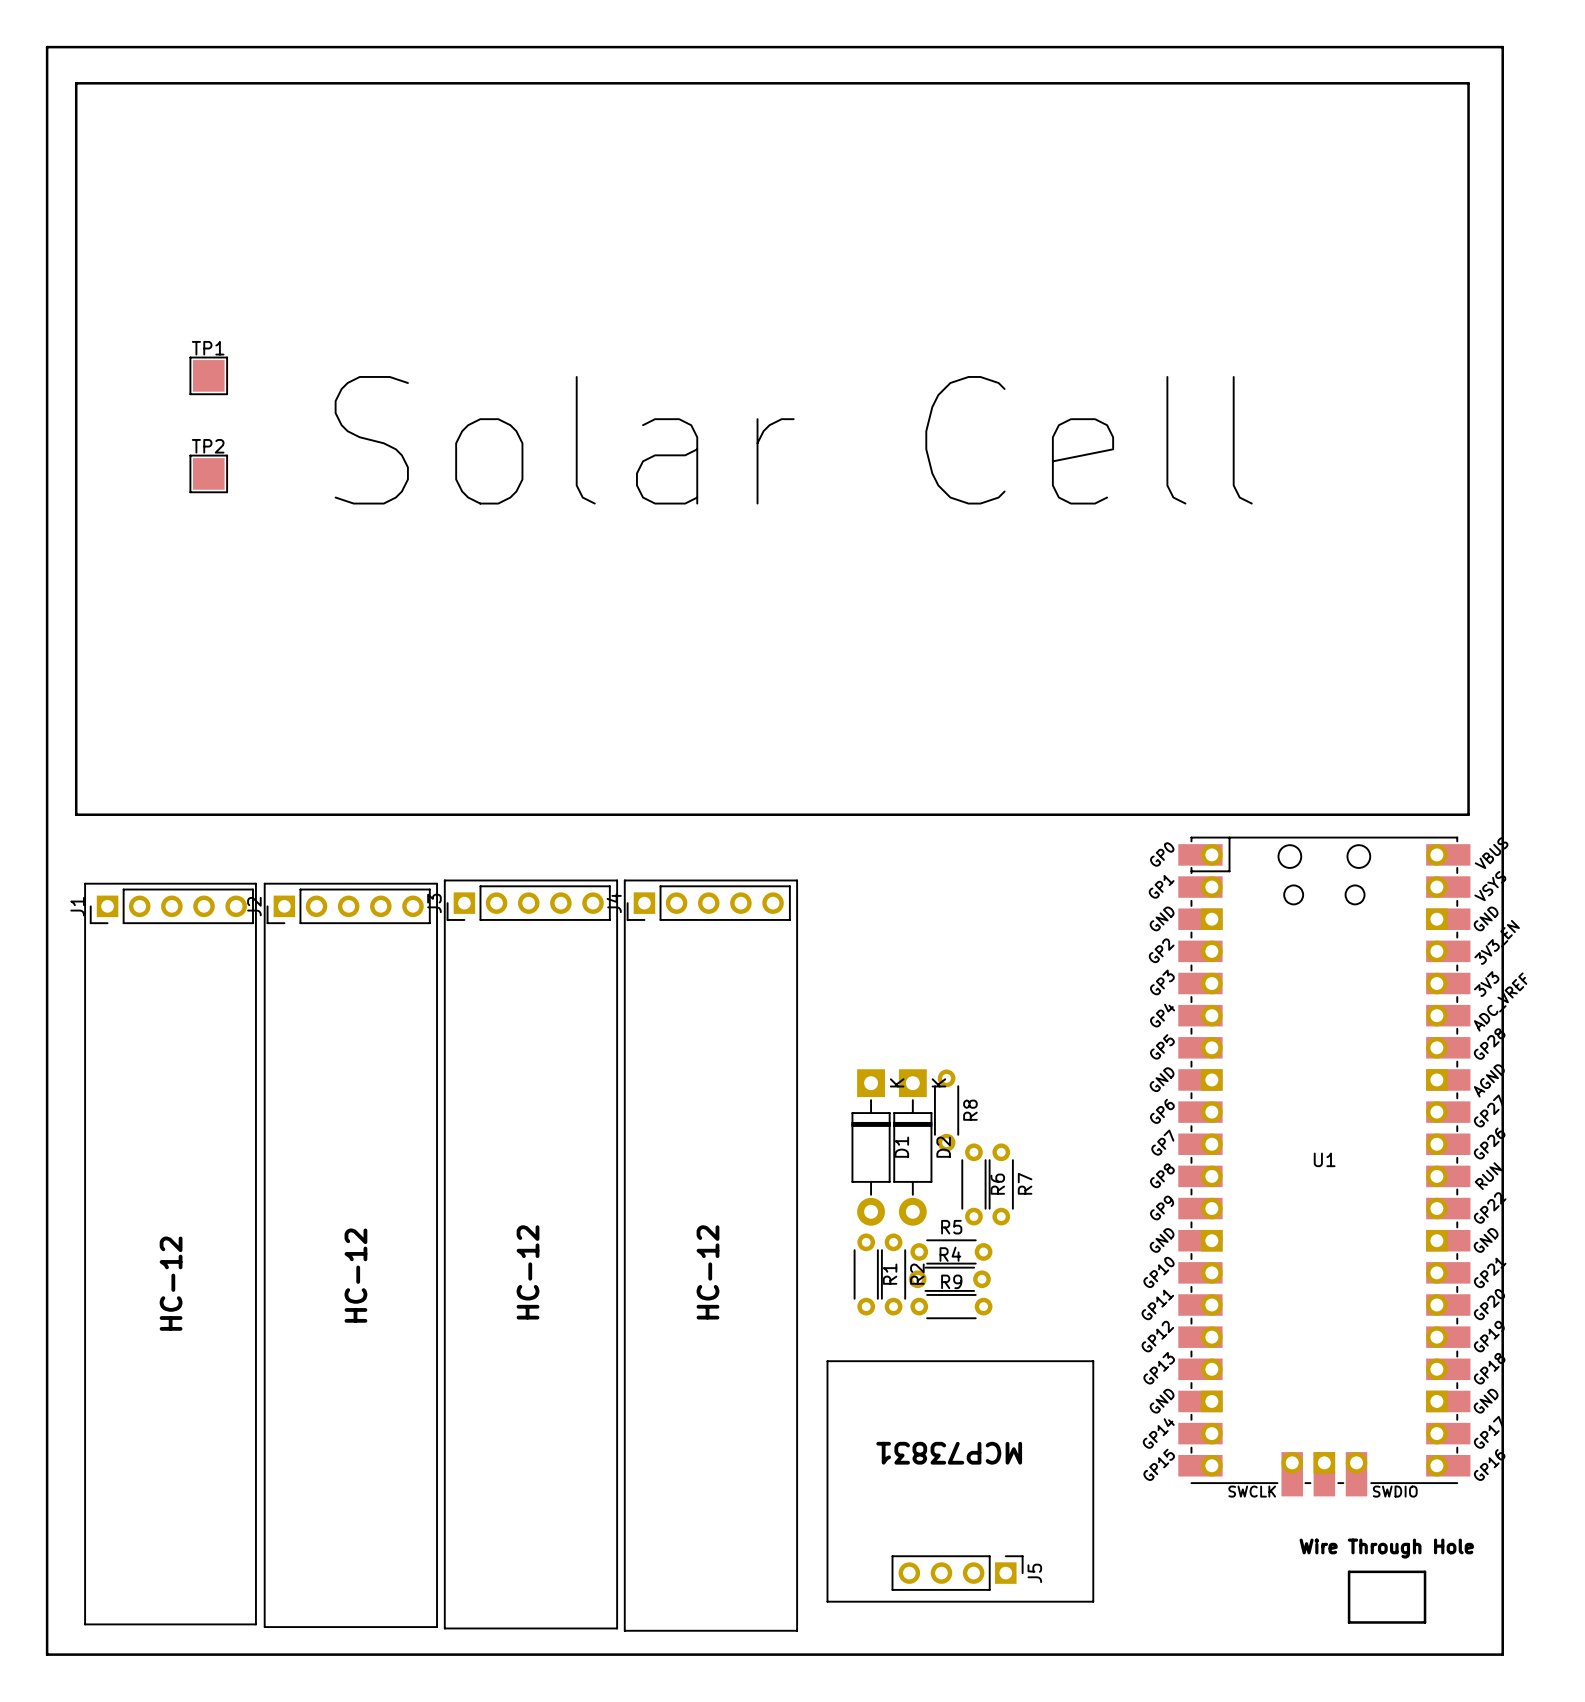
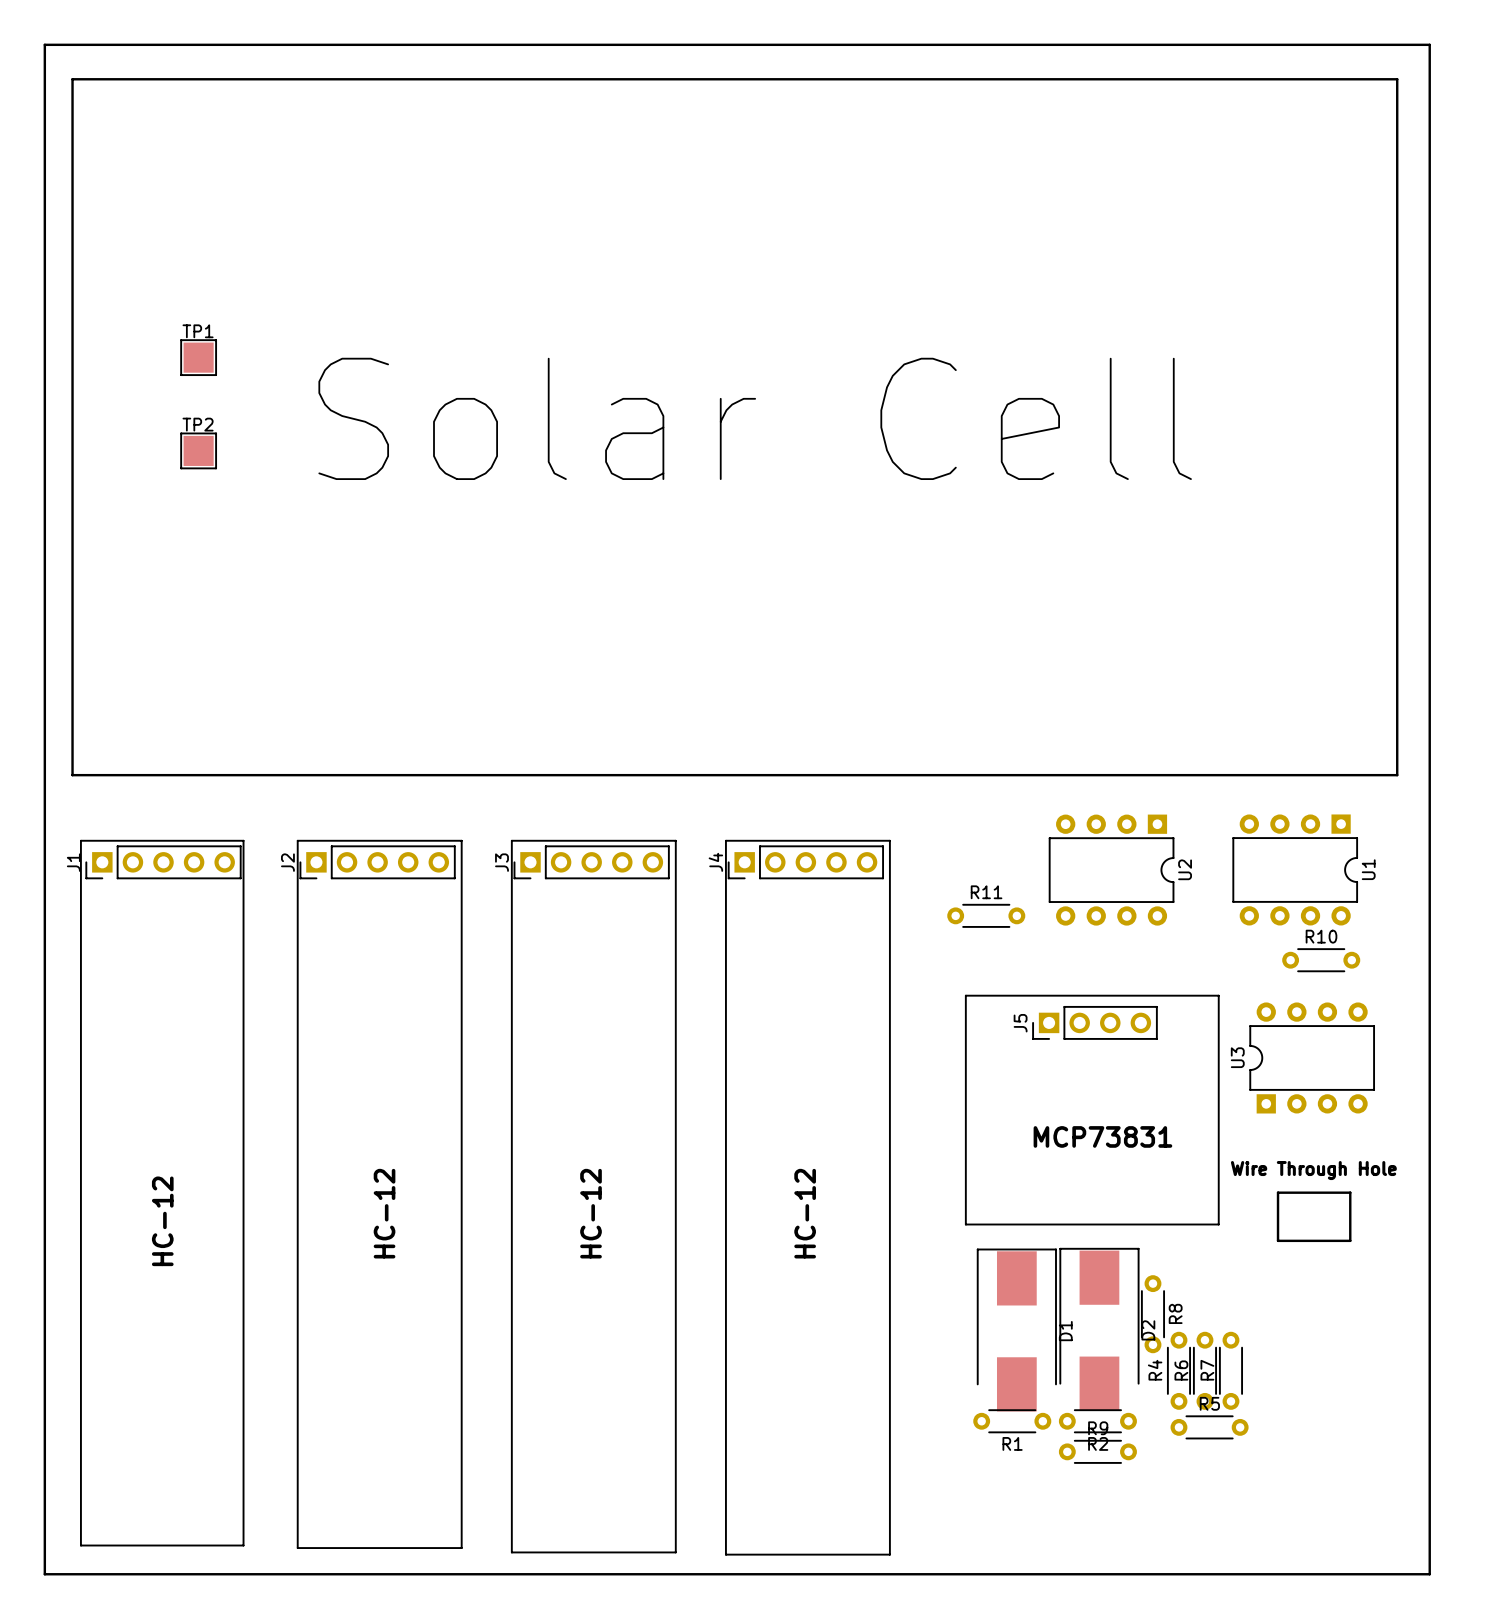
U1 footprint: [1178, 836, 1471, 1497] -> [1232, 814, 1358, 926]
line: (444, 880) (617, 880) (617, 1628) (444, 1628) (444, 880) -> (511, 840) (675, 840) (675, 1552) (511, 1552) (511, 840)
line: (624, 880) (797, 880) (797, 1630) (624, 1630) (624, 880) -> (725, 840) (889, 840) (889, 1554) (725, 1554) (725, 840)
line: (312, 883) (264, 883) (264, 1627) (312, 1627) -> (297, 840) (297, 1548)
line: (437, 883) (437, 1627) -> (415, 840) (461, 840) (461, 1548) (415, 1548)
J3 position: (528, 903) -> (591, 862)
J4 position: (708, 903) -> (805, 862)
J2 position: (348, 906) -> (377, 862)
U2: none -> (1111, 870)
R11: none -> (986, 915)
R10: none -> (1321, 960)
line: none -> (965, 995) (1218, 995) (1218, 1224) (965, 1224) (965, 995)
D1 footprint: [851, 1069, 891, 1226] -> [977, 1248, 1057, 1412]
D2 footprint: [893, 1069, 933, 1226] -> [1059, 1248, 1140, 1411]
R8 position: (946, 1110) -> (1152, 1314)
U3: none -> (1312, 1057)
U1 name position: U1 (1324, 1159) -> U1 (1368, 869)
R7 name position: R7 (1025, 1183) -> R7 (1207, 1370)
R6 position: (973, 1184) -> (1204, 1370)
R6 name position: R6 (997, 1184) -> R6 (1181, 1370)
R7 position: (1001, 1184) -> (1230, 1370)
text: none -> MCP73831 (1102, 1136)
text: none -> Wire Through Hole (1313, 1170)
R5 position: (951, 1251) -> (1209, 1427)
board edge: none -> (1278, 1192) (1350, 1192) (1350, 1240) (1278, 1240) (1278, 1192)
R4 name position: R4 (950, 1254) -> R4 (1155, 1370)
text: HC-12 (528, 1272) -> none
text: HC-12 (707, 1272) -> none
R1 rotation: 0° (866, 1274) -> 90° clockwise (1012, 1421)
R1 position: (866, 1274) -> (1012, 1421)
R2 rotation: 0° (893, 1274) -> 90° clockwise (1097, 1421)
R2 position: (893, 1274) -> (1097, 1421)
text position: HC-12 (355, 1275) -> HC-12 (384, 1213)
text: none -> HC-12 (591, 1213)
text: none -> HC-12 (805, 1213)
R4 rotation: 0° (949, 1279) -> 90° clockwise (1178, 1370)
R4 position: (949, 1279) -> (1178, 1370)
R9 position: (951, 1306) -> (1097, 1451)
line: (827, 1361) (827, 1601) (1093, 1601) (1093, 1361) (827, 1361) -> none
text: MCP73831 (949, 1453) -> none
text: Wire Through Hole (1386, 1548) -> none
board edge: (1349, 1571) (1425, 1571) (1425, 1622) (1349, 1622) (1349, 1571) -> none
J5 rotation: 0° (957, 1573) -> 180° (1094, 1022)
J5 position: (957, 1573) -> (1094, 1022)

